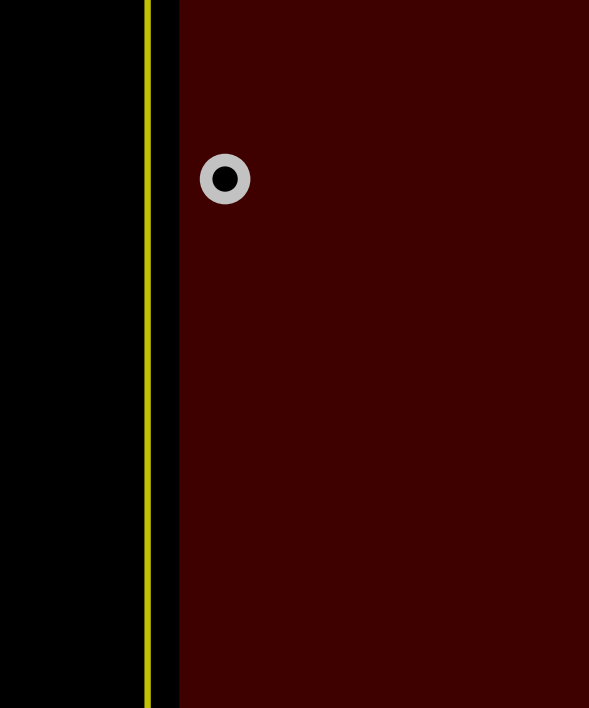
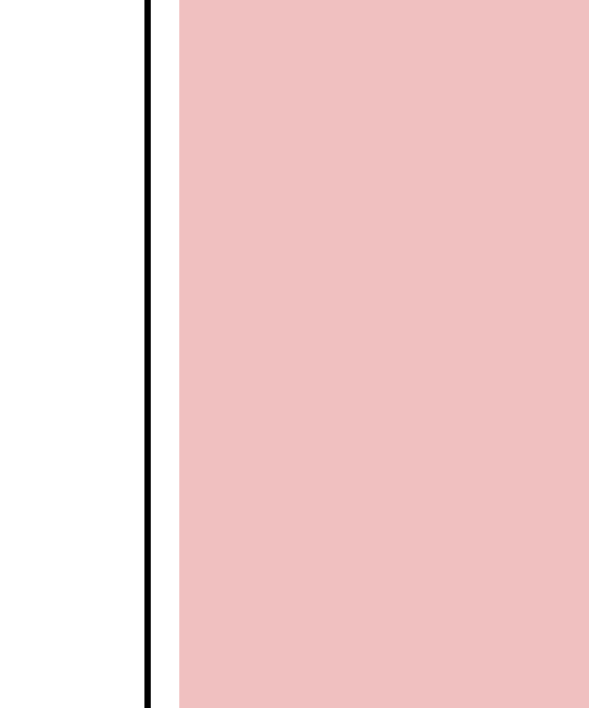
via: (225, 179) -> none

